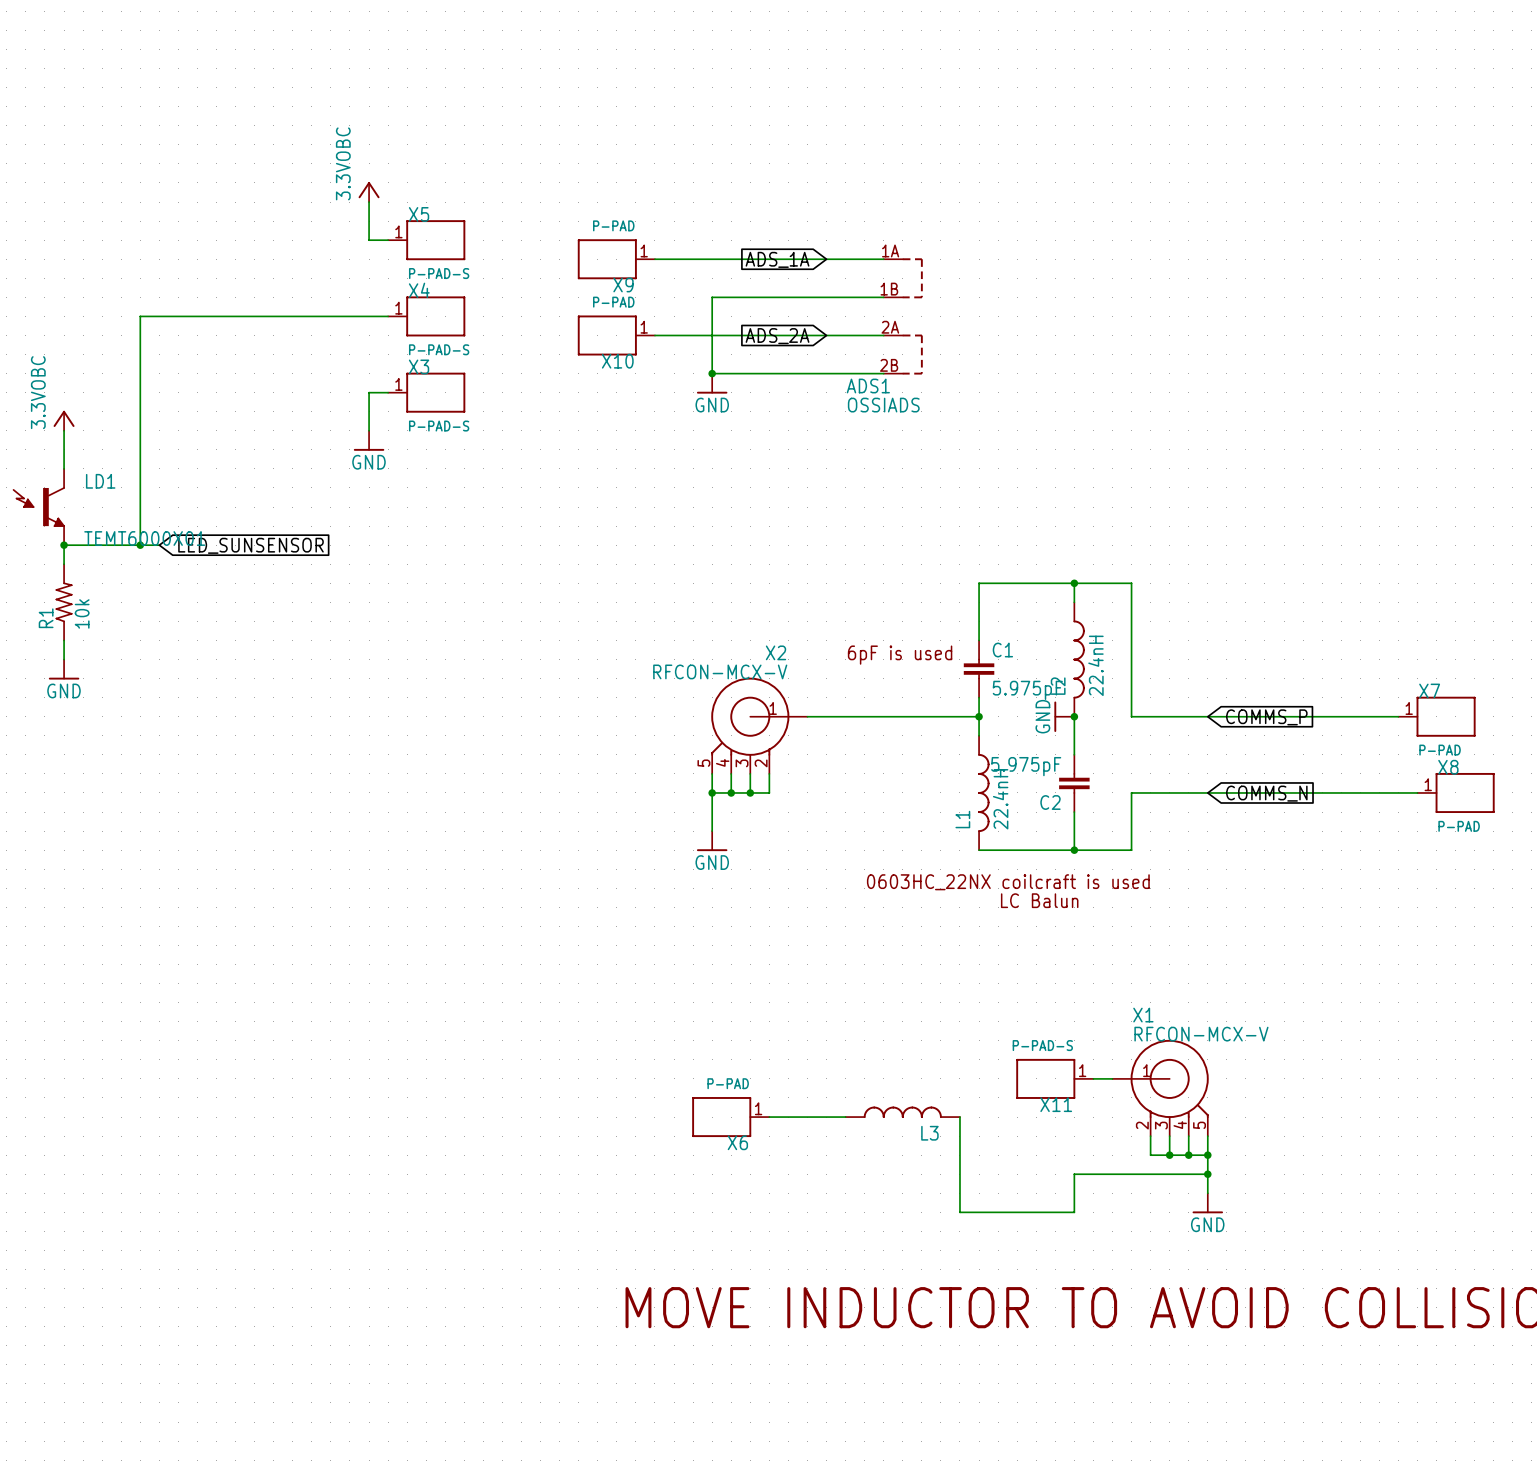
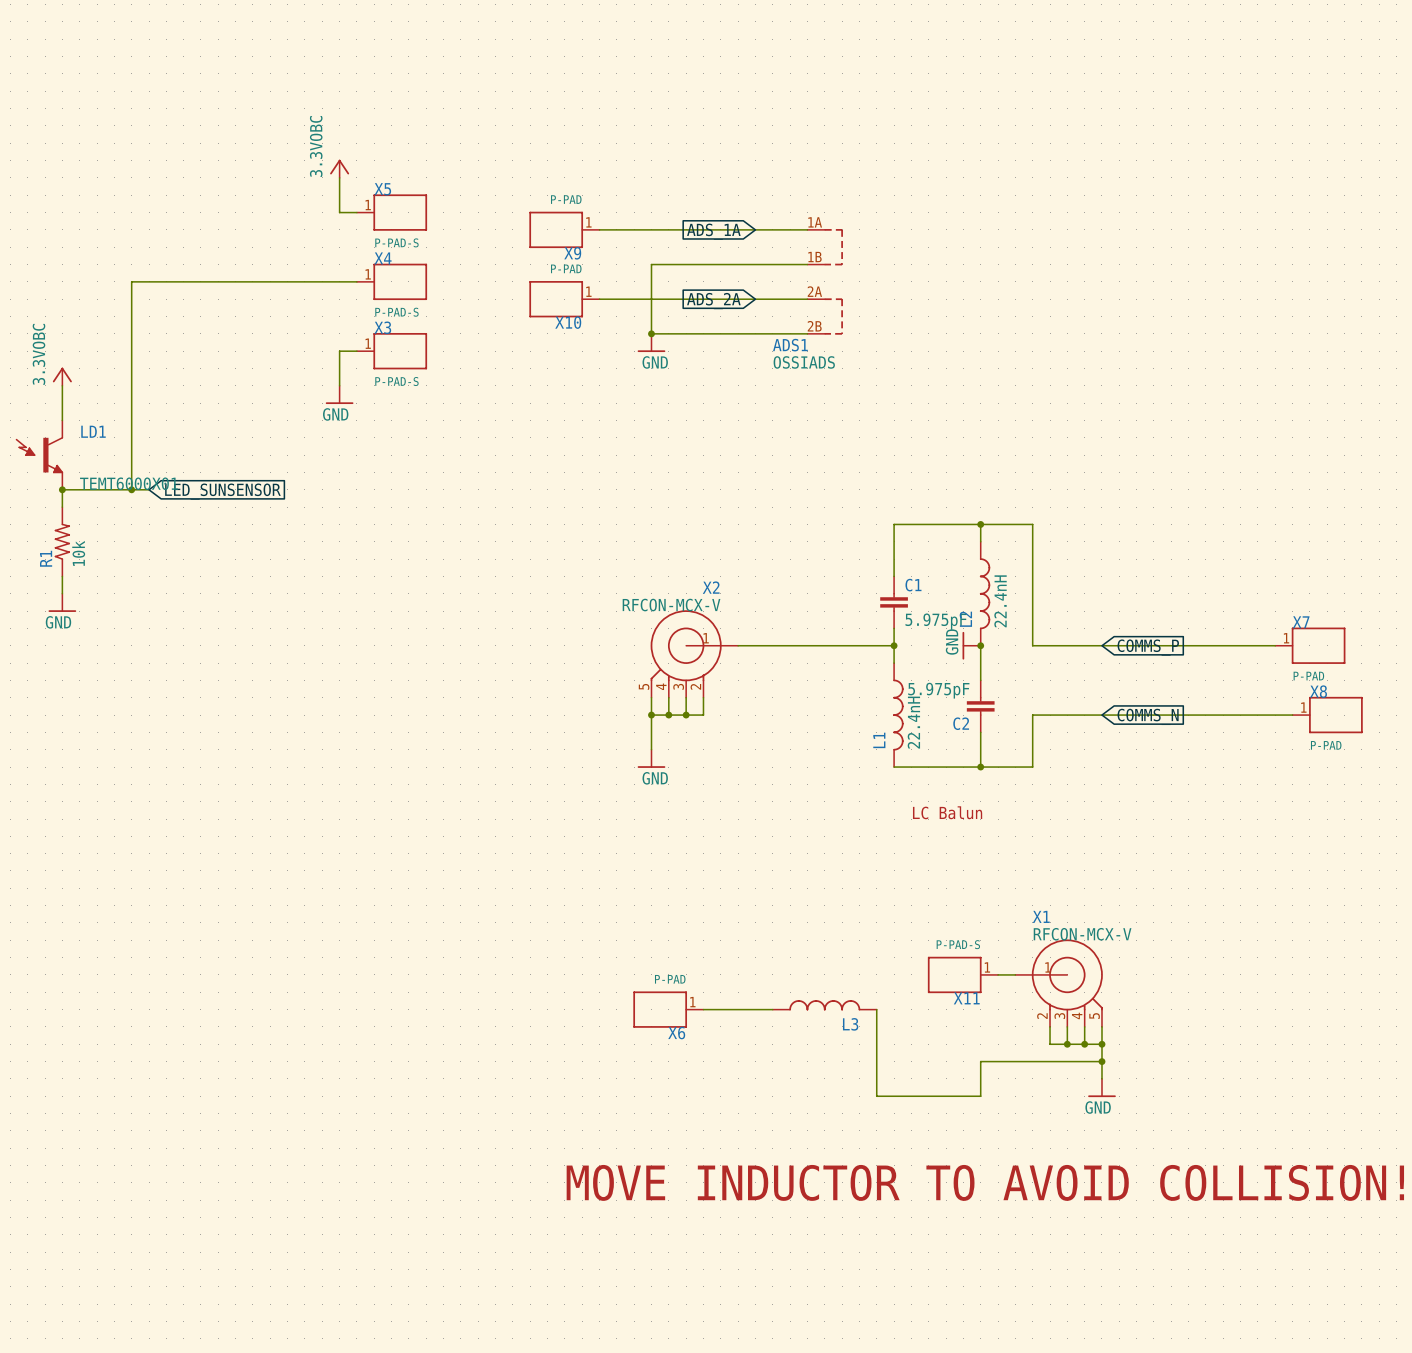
text: 6pF is used (900, 655) -> none
text: 0603HC_22NX coilcraft is used (1008, 882) -> none

